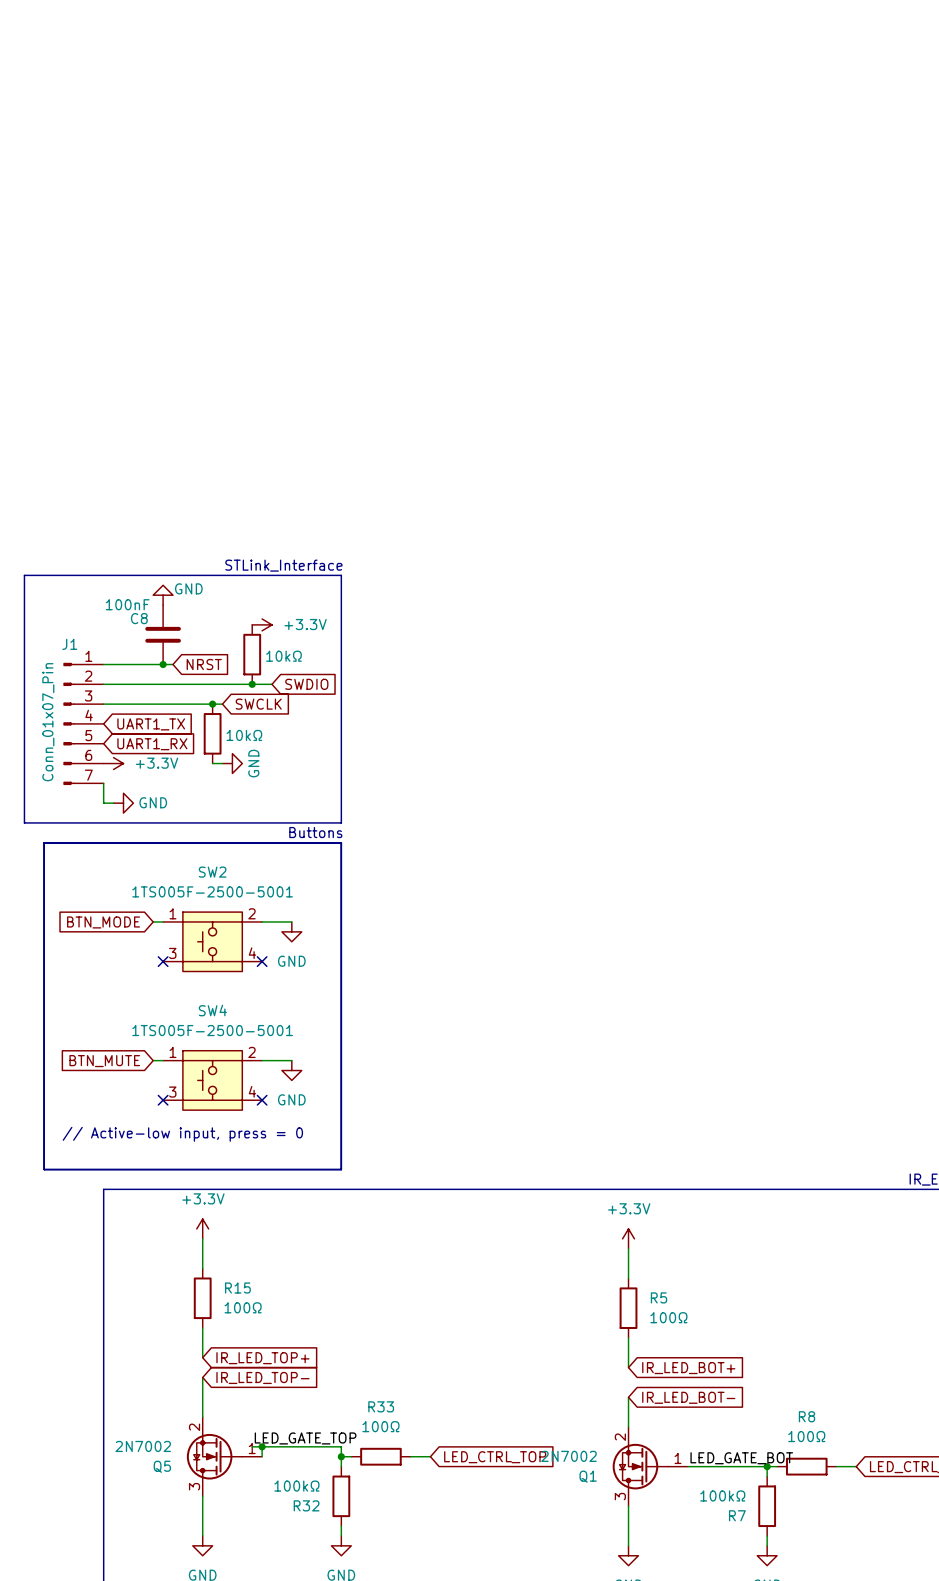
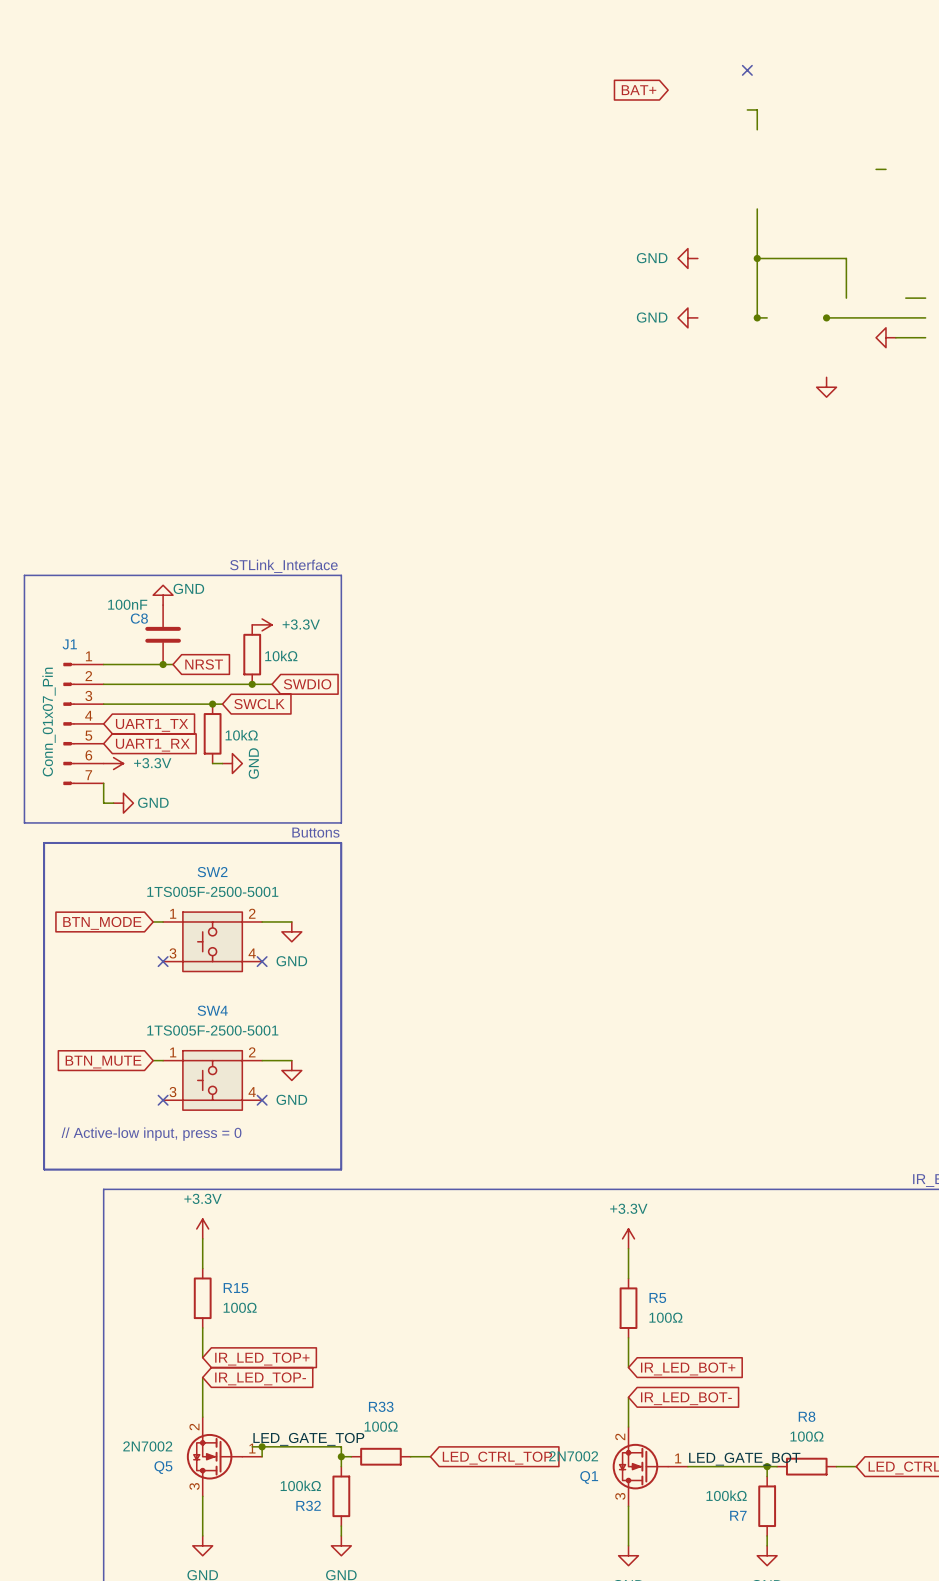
no-connect mark: none -> (747, 70)
global label: none -> BAT+ (639, 90)
wire: none -> (747, 109) (757, 109) (757, 129)
wire: none -> (876, 169) (885, 169)
wire: none -> (757, 208) (757, 317) (767, 317)
power symbol: none -> GND (687, 258)
wire: none -> (757, 258) (846, 258) (846, 298)
junction: none -> (757, 258)
wire: none -> (905, 298) (925, 298)
power symbol: none -> GND (687, 317)
junction: none -> (757, 317)
wire: none -> (826, 317) (925, 317)
junction: none -> (826, 317)
power symbol: none -> (885, 337)
wire: none -> (895, 337) (925, 337)
power symbol: none -> (826, 387)

